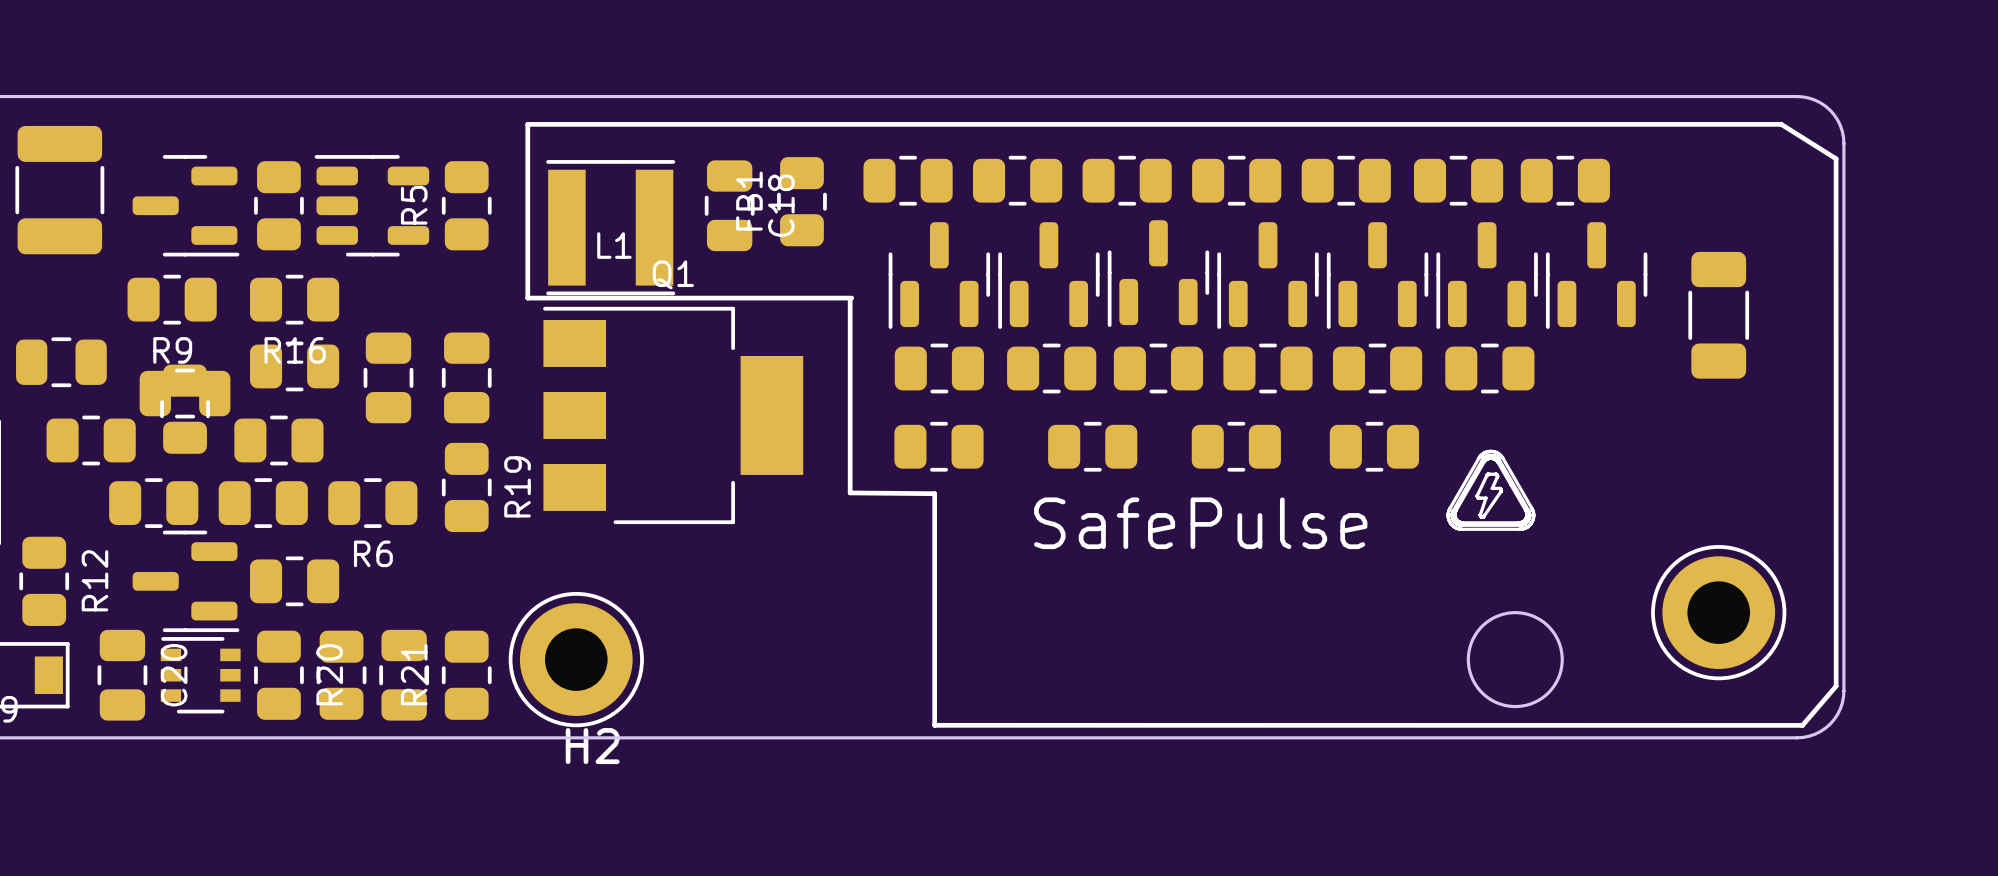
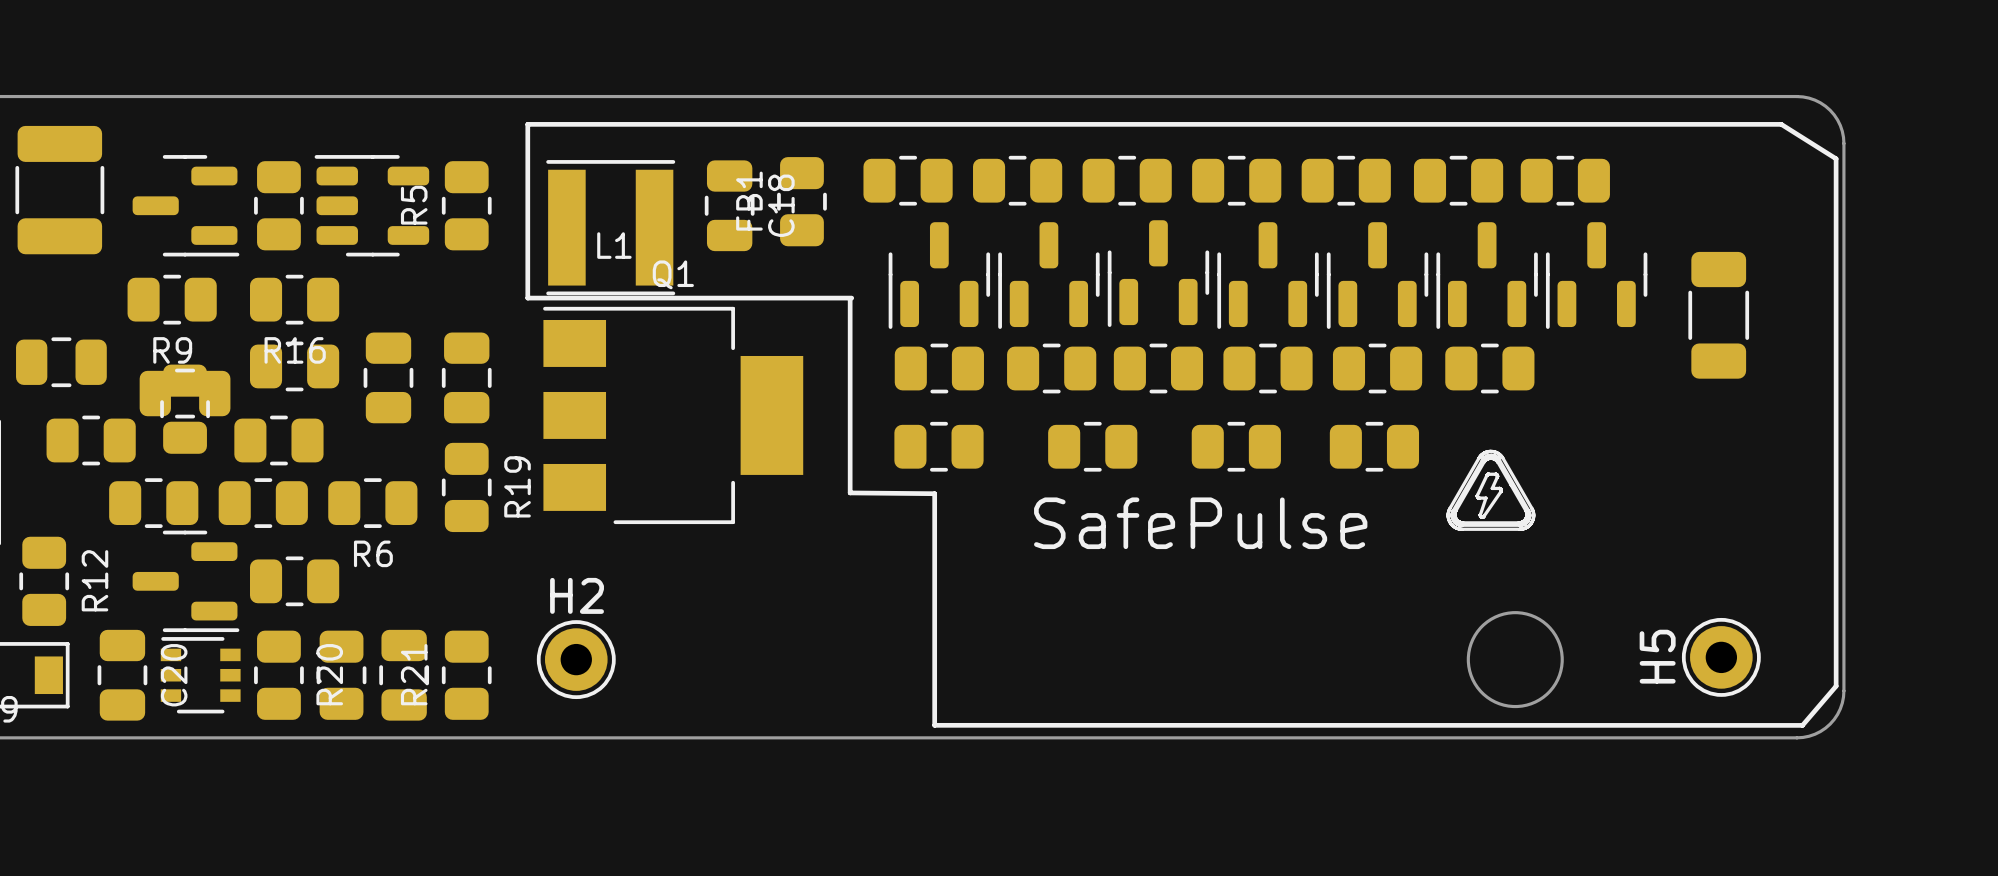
H2 footprint: [508, 591, 644, 728] -> [536, 620, 616, 700]
part: (1718, 612) -> none
H5: none -> (1721, 657)
H2 name position: H2 (592, 746) -> H2 (577, 595)

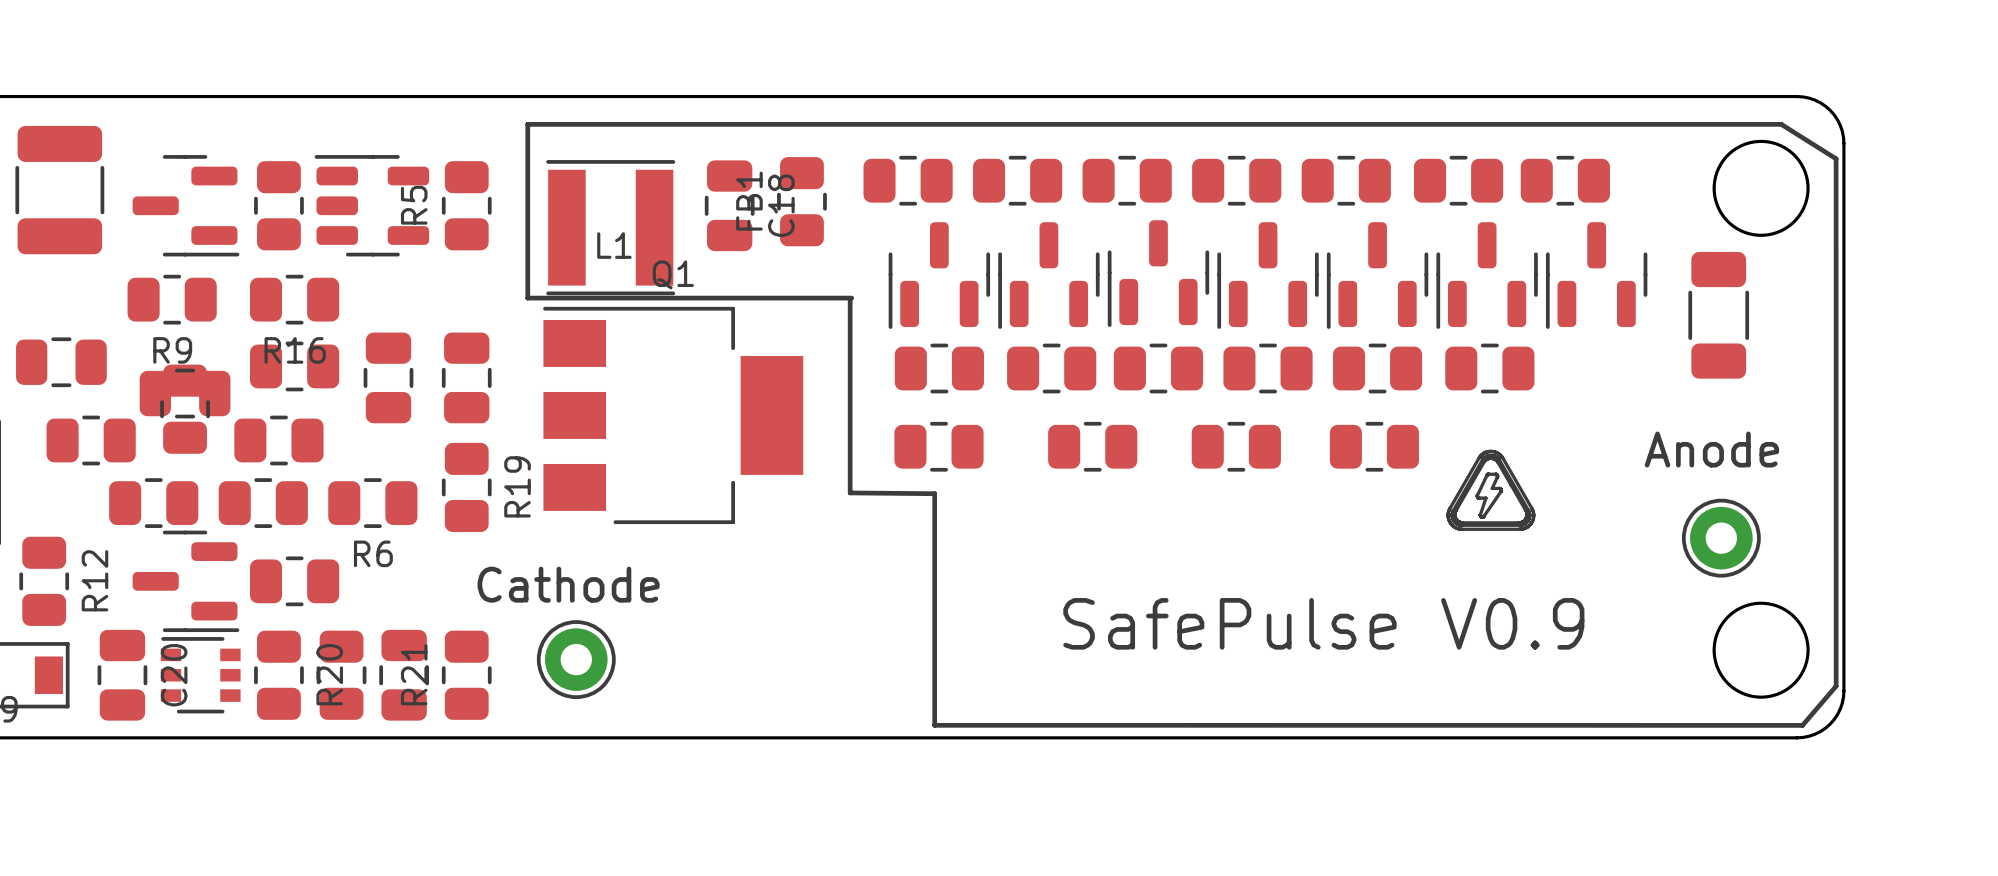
round board edge: none -> [1712, 139, 1810, 237]
text: SafePulse (1200, 523) -> none
part: none -> Anode (1721, 538)
H2 value: none -> Cathode (568, 584)
H2 name: H2 (577, 595) -> none
text: none -> SafePulse V0.9 (1323, 623)
H5: (1721, 657) -> none
round board edge position: (1515, 659) -> (1761, 650)

